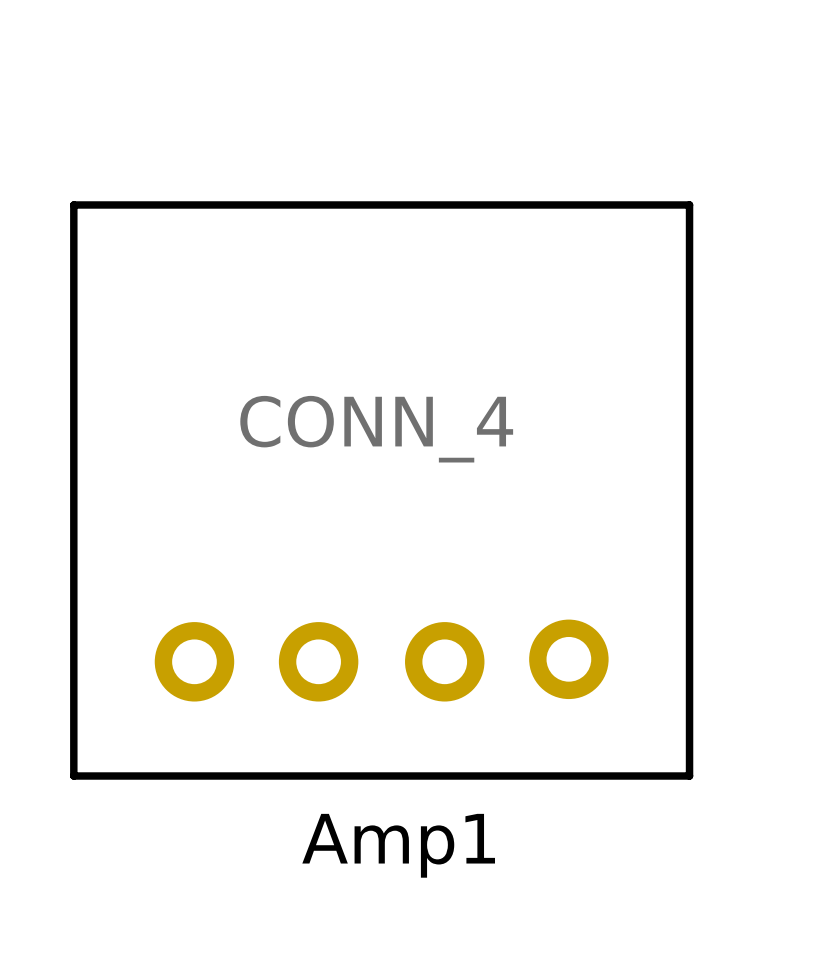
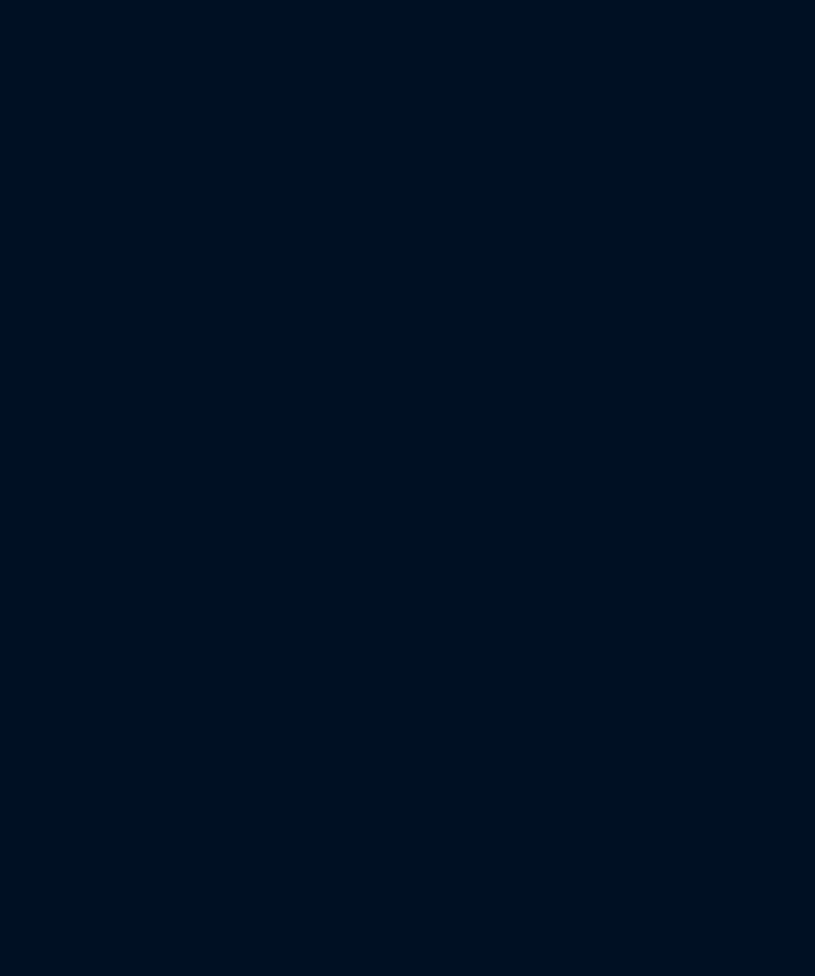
Amp1: CONN_4 (381, 490) -> none

